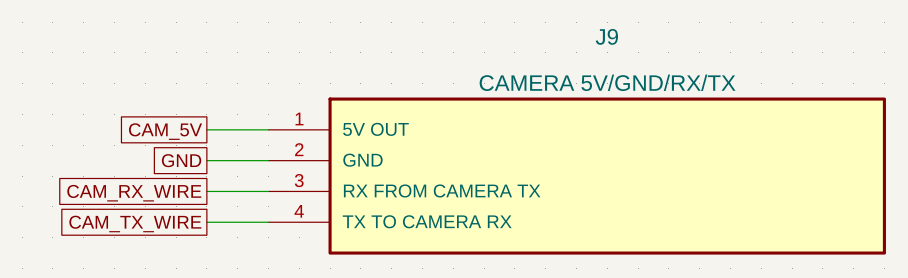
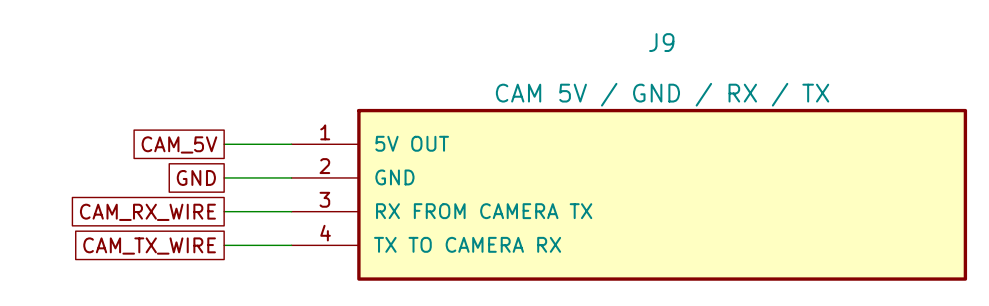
J9 value: CAMERA 5V/GND/RX/TX (607, 82) -> CAM 5V / GND / RX / TX (662, 94)

